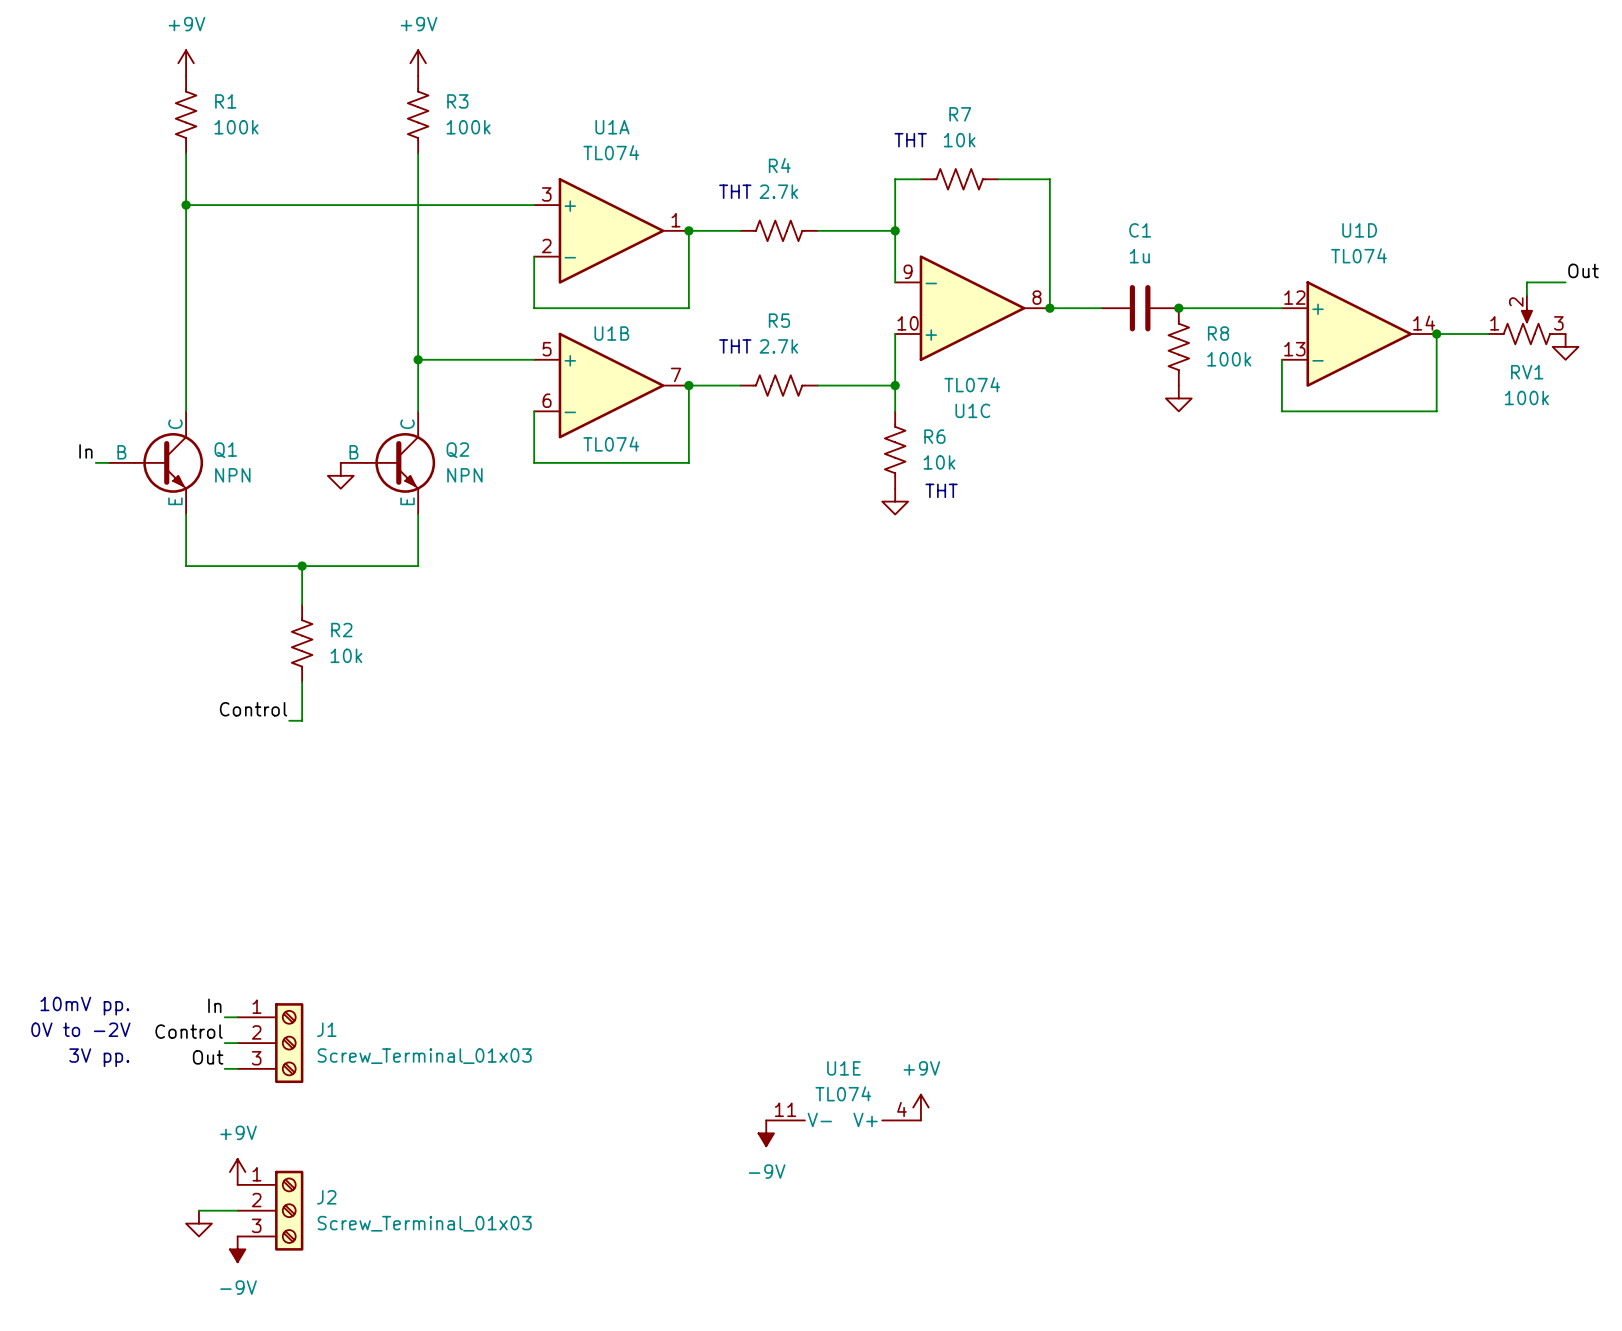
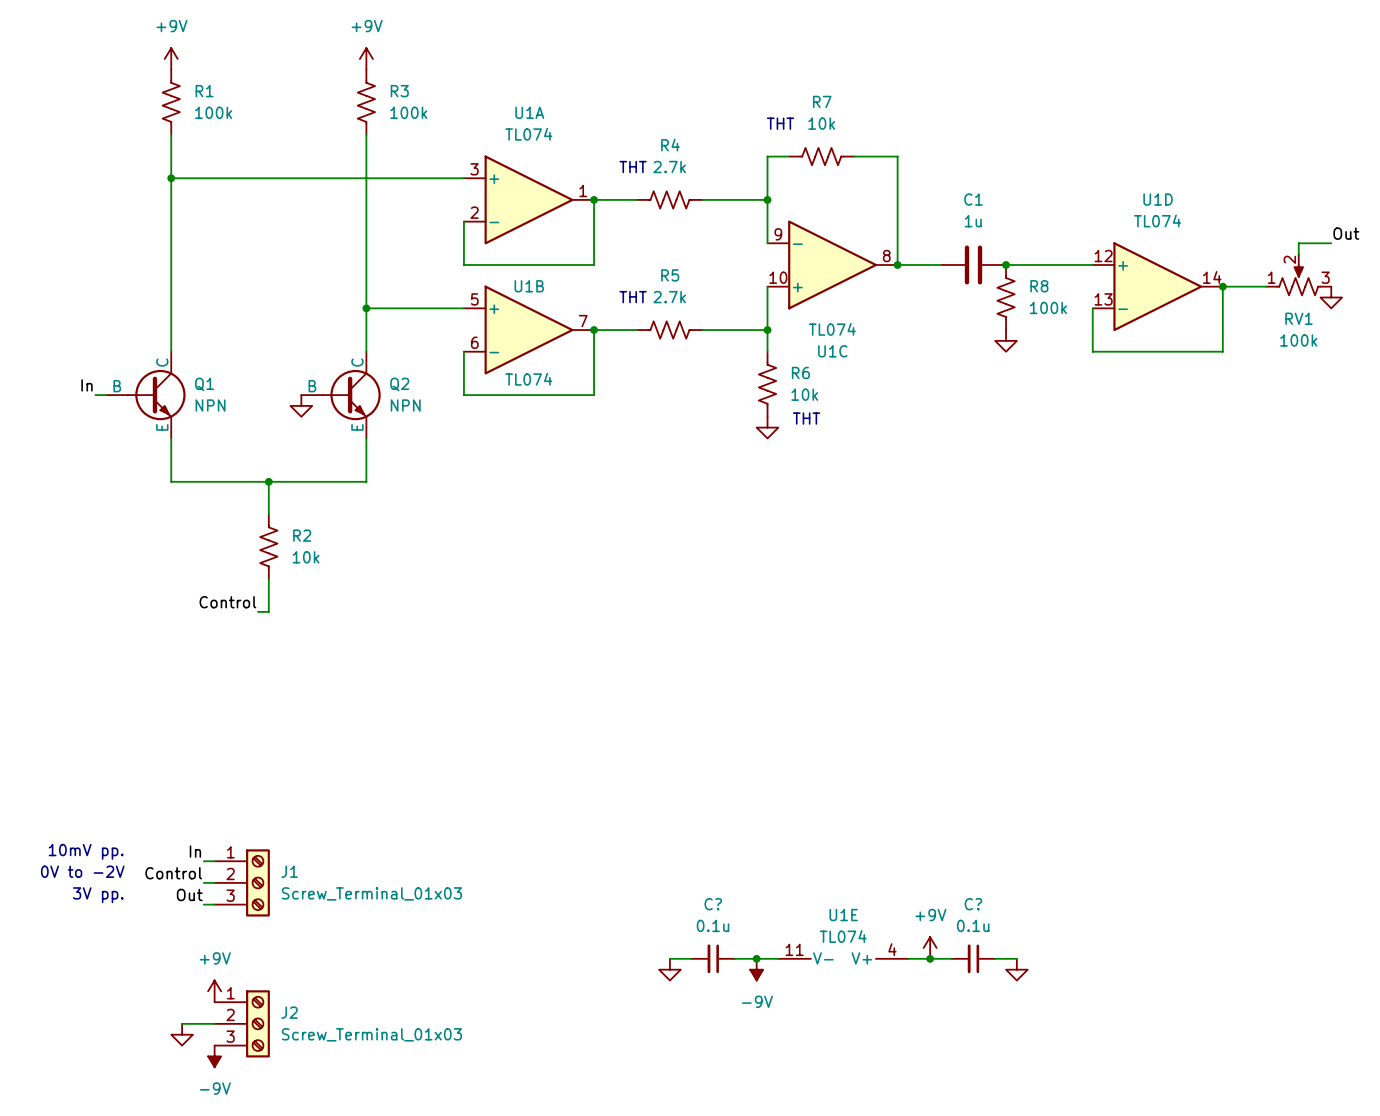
power symbol position: +9V (920, 1107) -> +9V (930, 947)
U1E position: (843, 1120) -> (843, 958)
power symbol position: -9V (766, 1133) -> -9V (756, 969)
wire: none -> (669, 958) (691, 958)
C?: none -> 0.1u (713, 958)
wire: none -> (734, 958) (778, 958)
junction: none -> (756, 958)
wire: none -> (908, 958) (951, 958)
junction: none -> (930, 958)
C?: none -> 0.1u (973, 958)
wire: none -> (995, 958) (1016, 958)
power symbol: none -> (669, 969)
power symbol: none -> (1016, 969)

